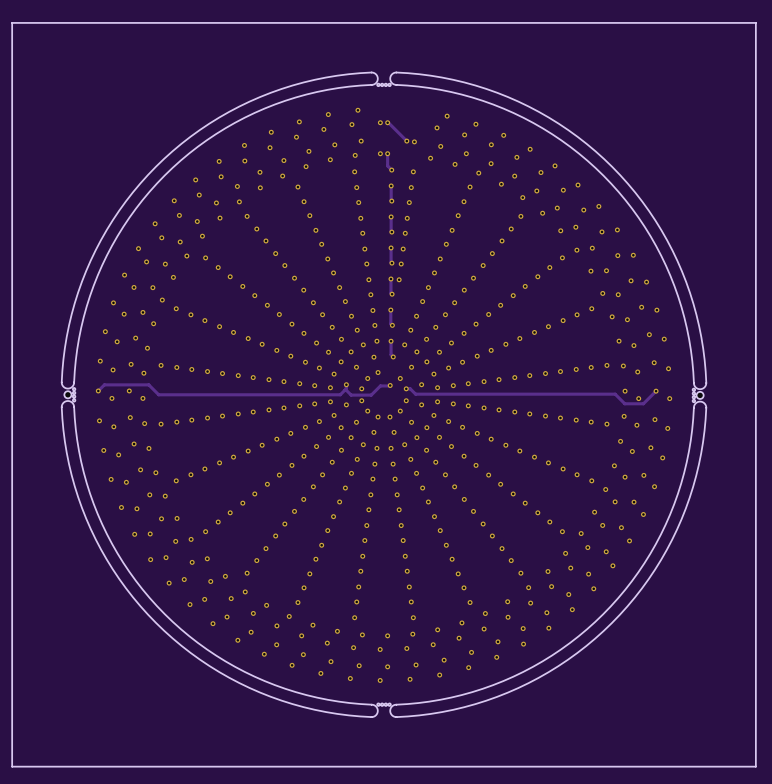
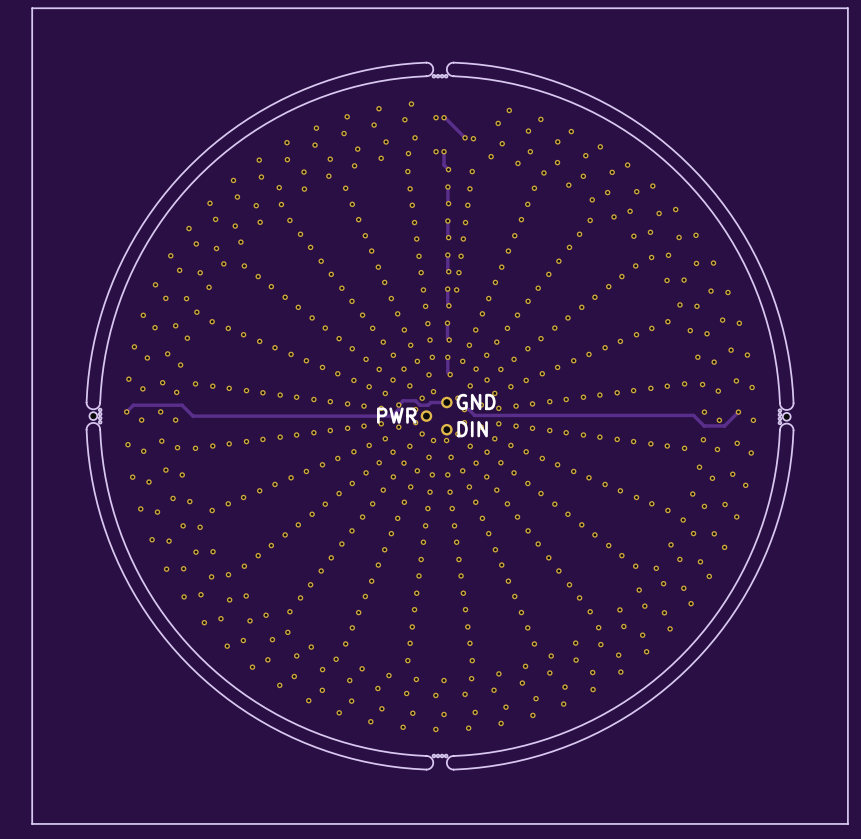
track: none -> (447, 402) (430, 402) (428, 405) (419, 405) (415, 400) (403, 400) (398, 405)
part: none -> GND (446, 402)
track: (390, 385) (380, 385) (371, 395) (351, 395) (346, 388) -> none
via: (390, 385) -> none
part: none -> PWR (426, 416)
part: none -> DIN (446, 429)

